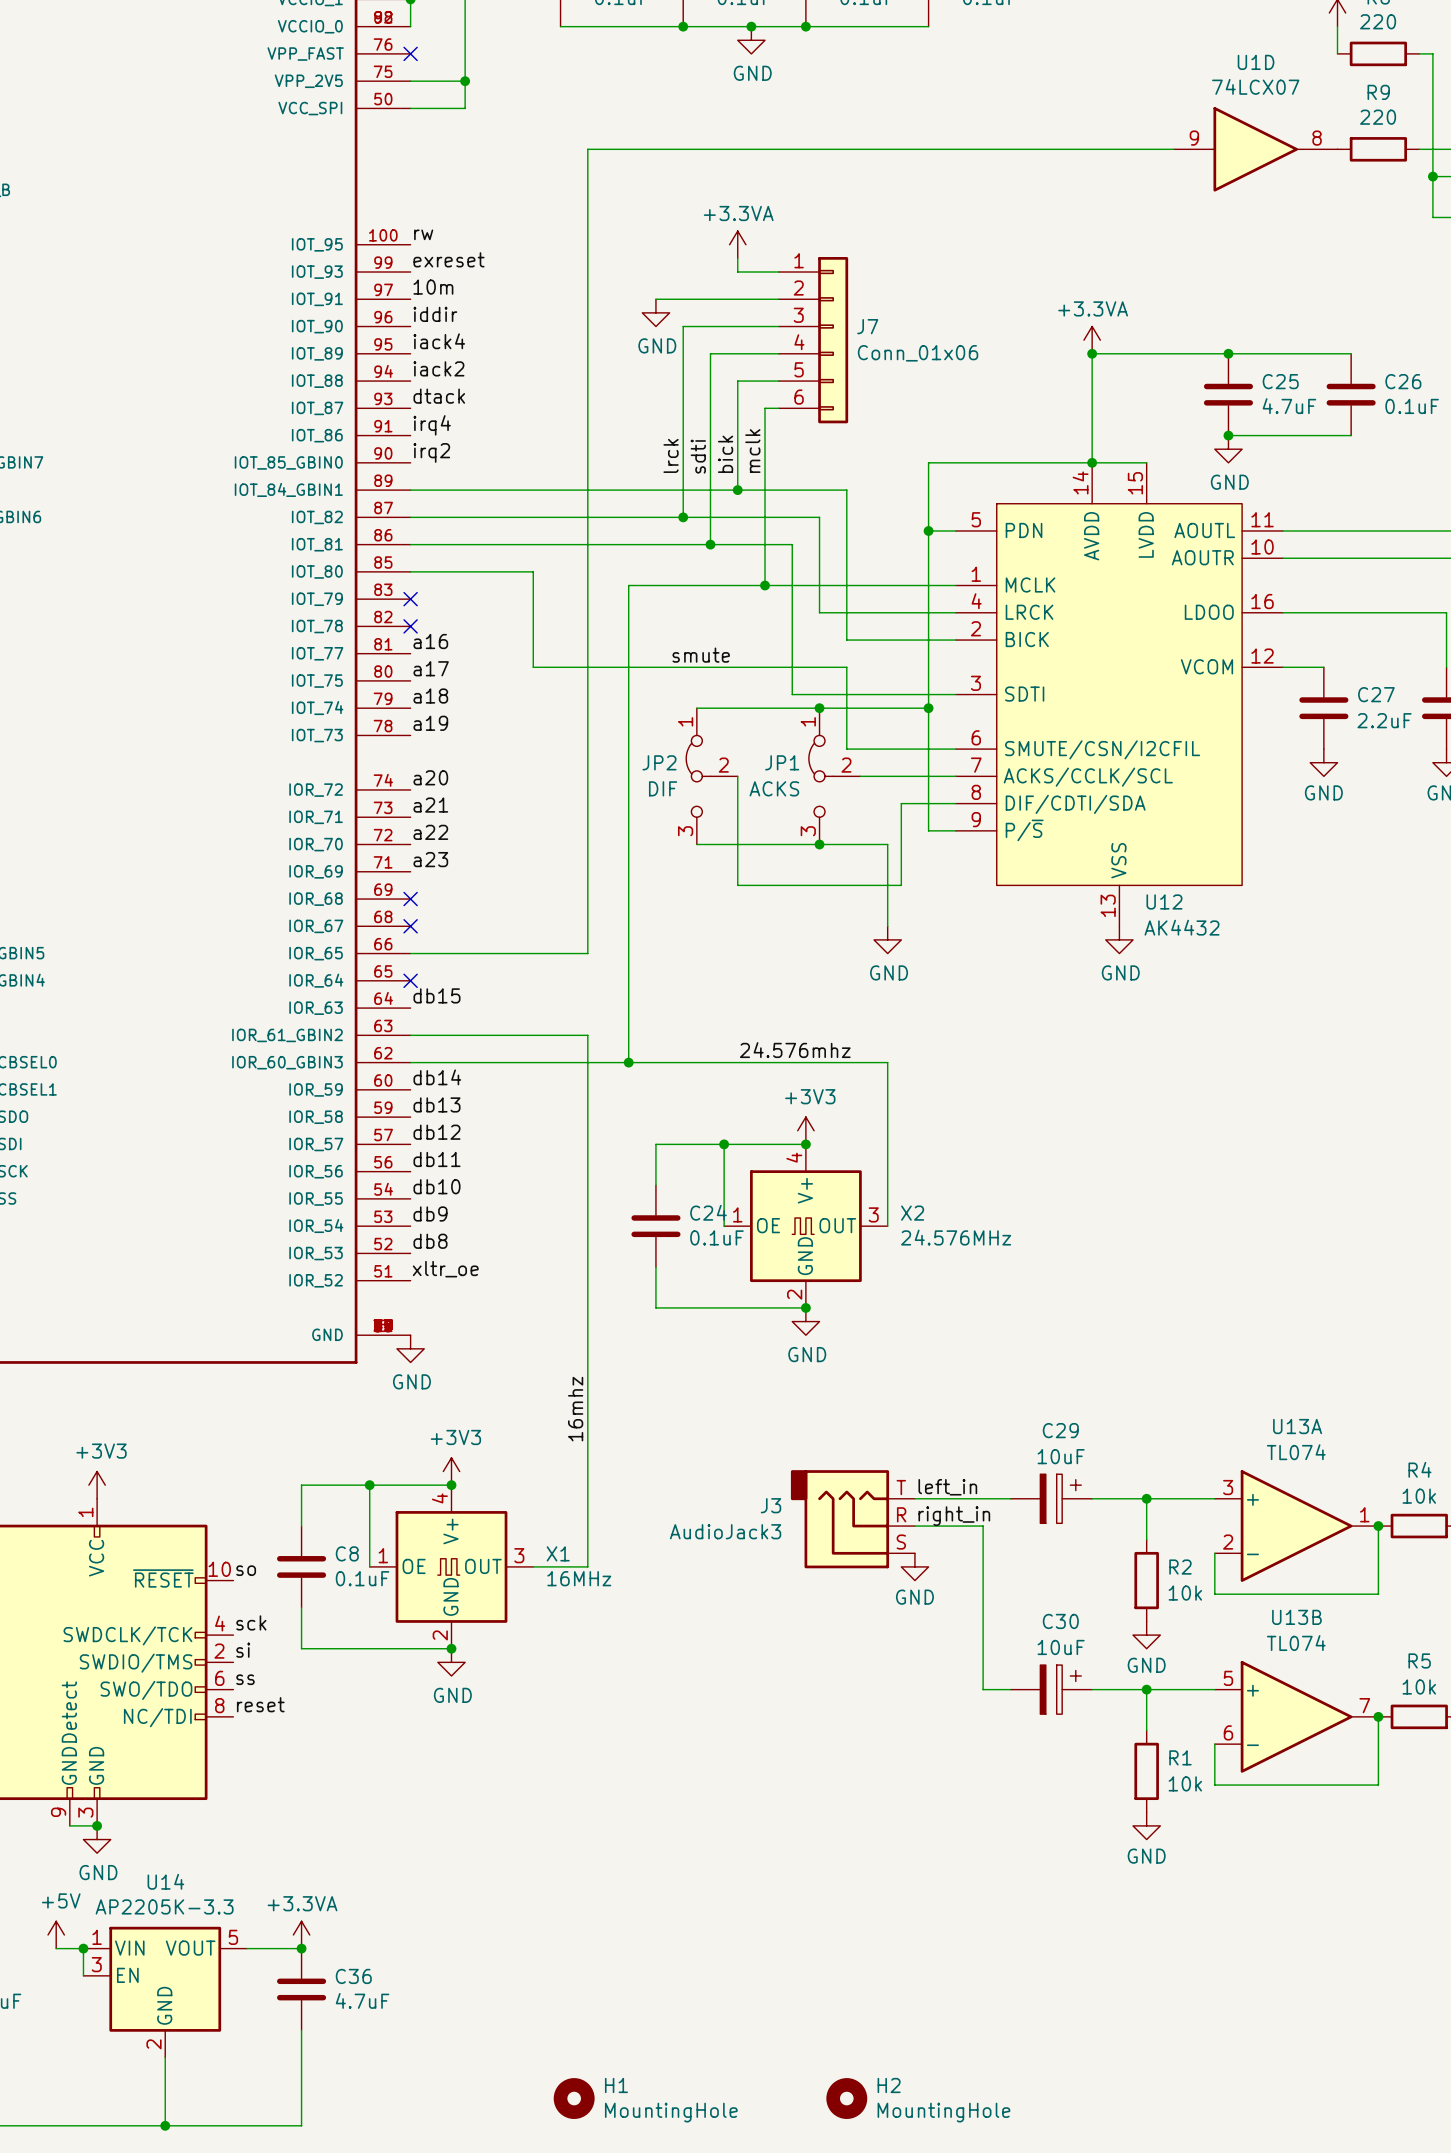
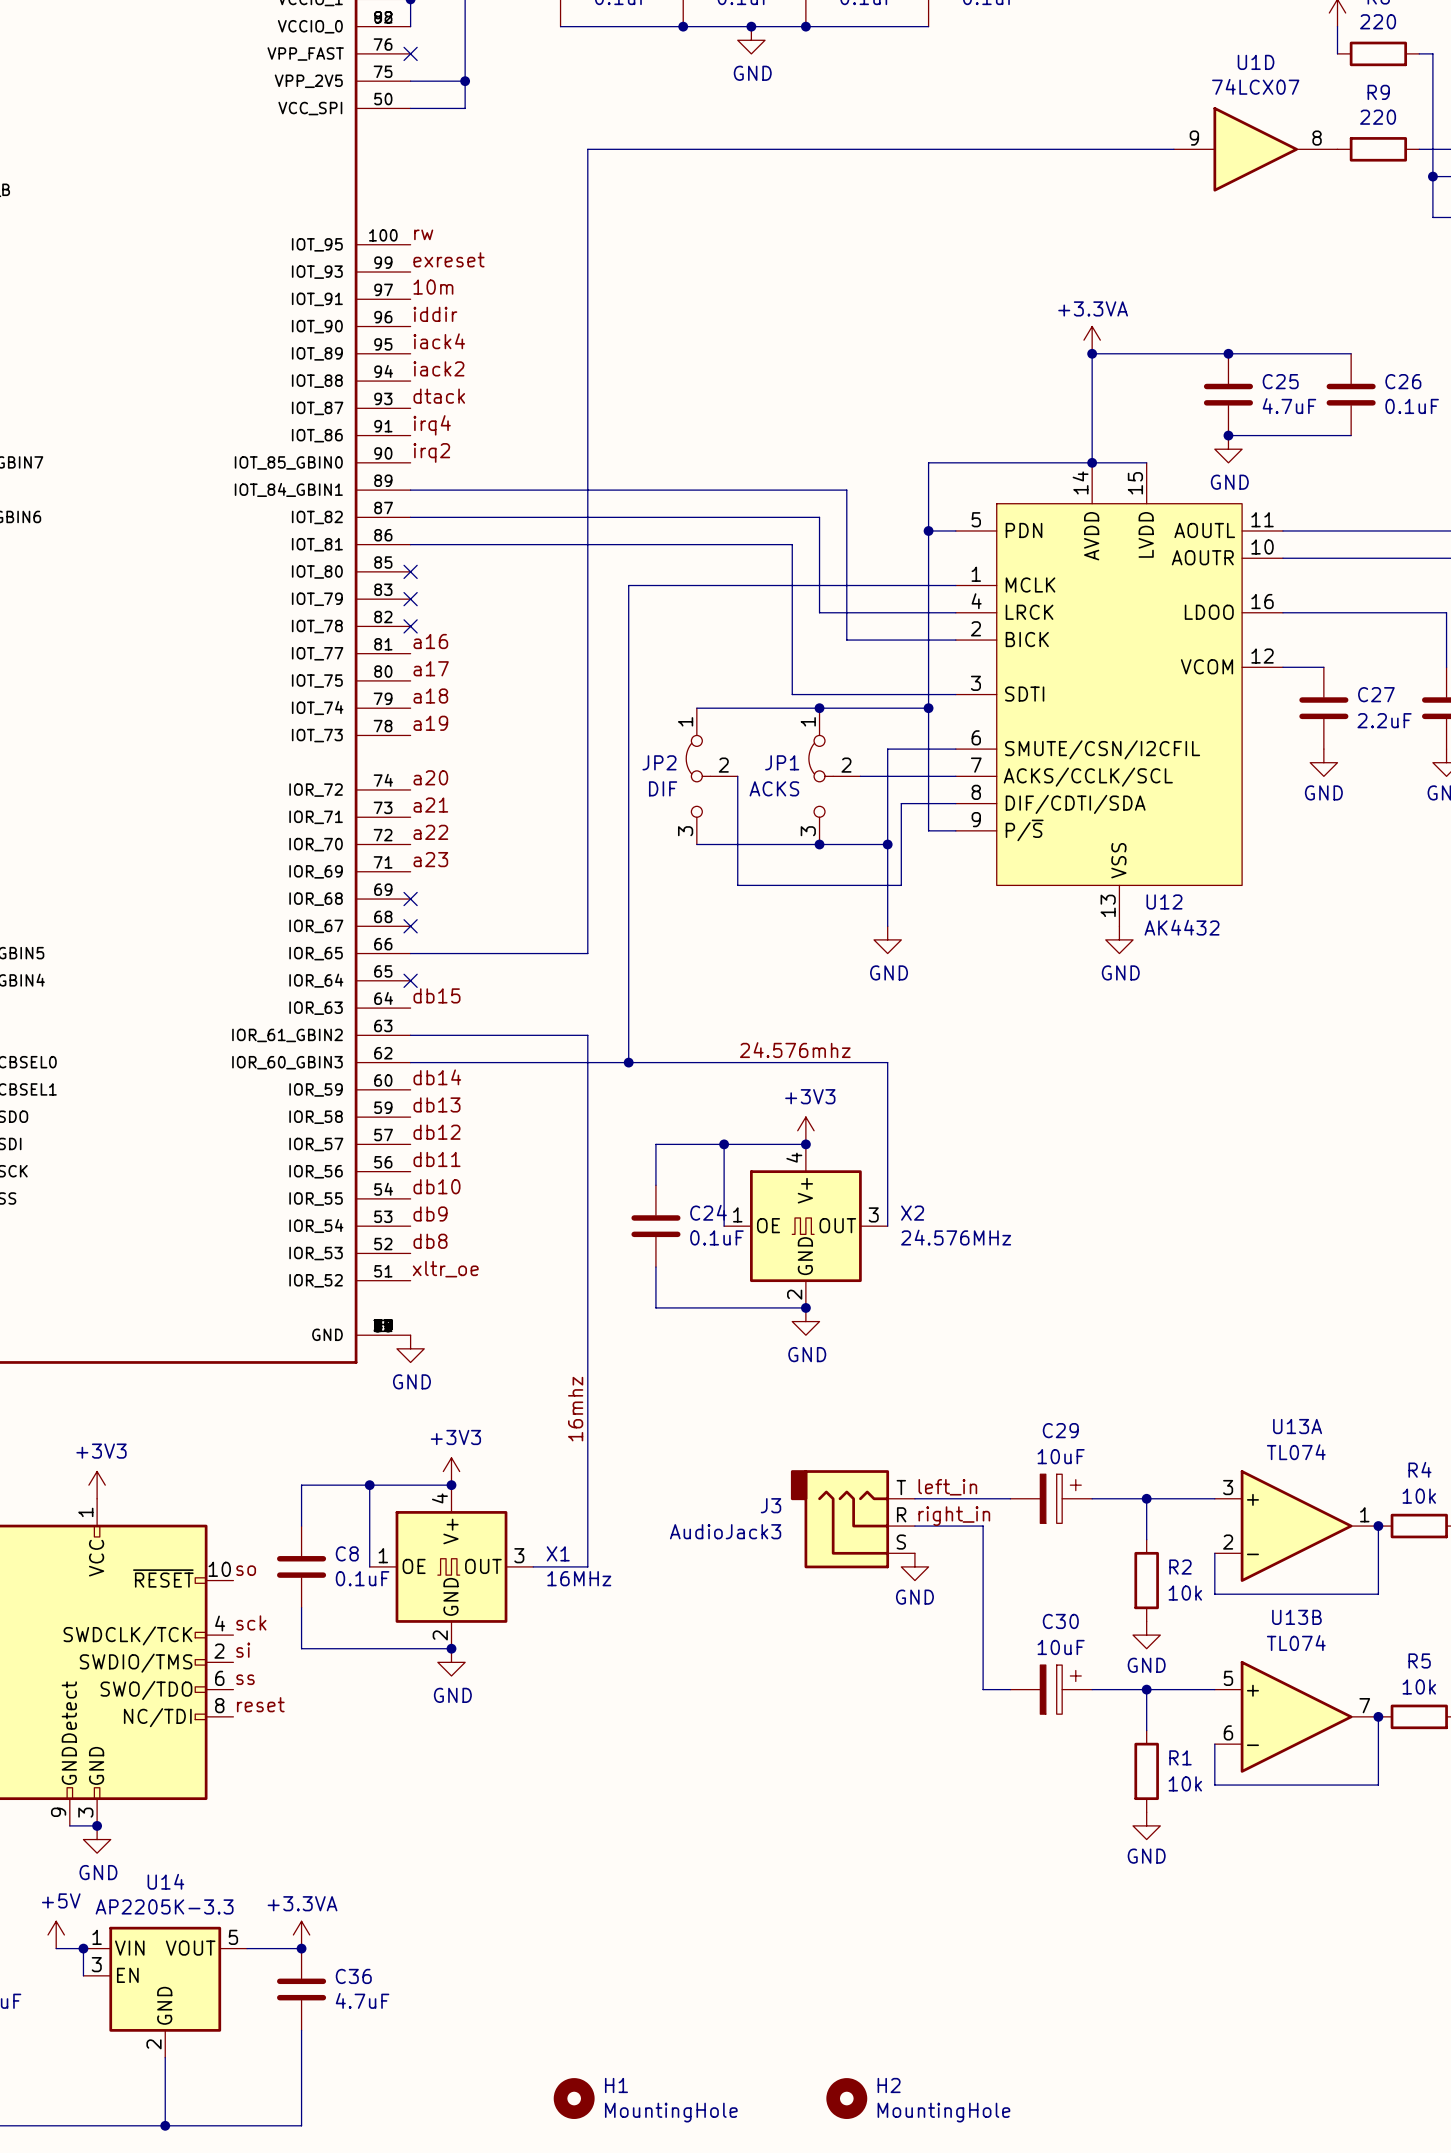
power symbol: +3.3VA (737, 244) -> none
wire: (737, 258) (737, 272) (778, 272) -> none
wire: (655, 299) (778, 299) -> none
power symbol: GND (655, 312) -> none
wire: (778, 326) (683, 326) (683, 517) -> none
J7: Conn_01x06 (813, 340) -> none
wire: (778, 353) (710, 353) (710, 544) -> none
wire: (778, 381) (737, 381) (737, 490) -> none
wire: (778, 408) (765, 408) (765, 585) -> none
label: mclk (752, 451) -> none
label: bick (725, 454) -> none
label: lrck (671, 455) -> none
label: sdti (698, 456) -> none
junction: (737, 490) -> none
junction: (683, 517) -> none
junction: (710, 544) -> none
wire: (410, 571) (533, 571) (533, 667) (846, 667) (846, 749) (887, 749) -> (887, 844) (887, 749)
no-connect mark: none -> (410, 571)
junction: (765, 585) -> none
label: smute (701, 655) -> none
junction: none -> (887, 844)

